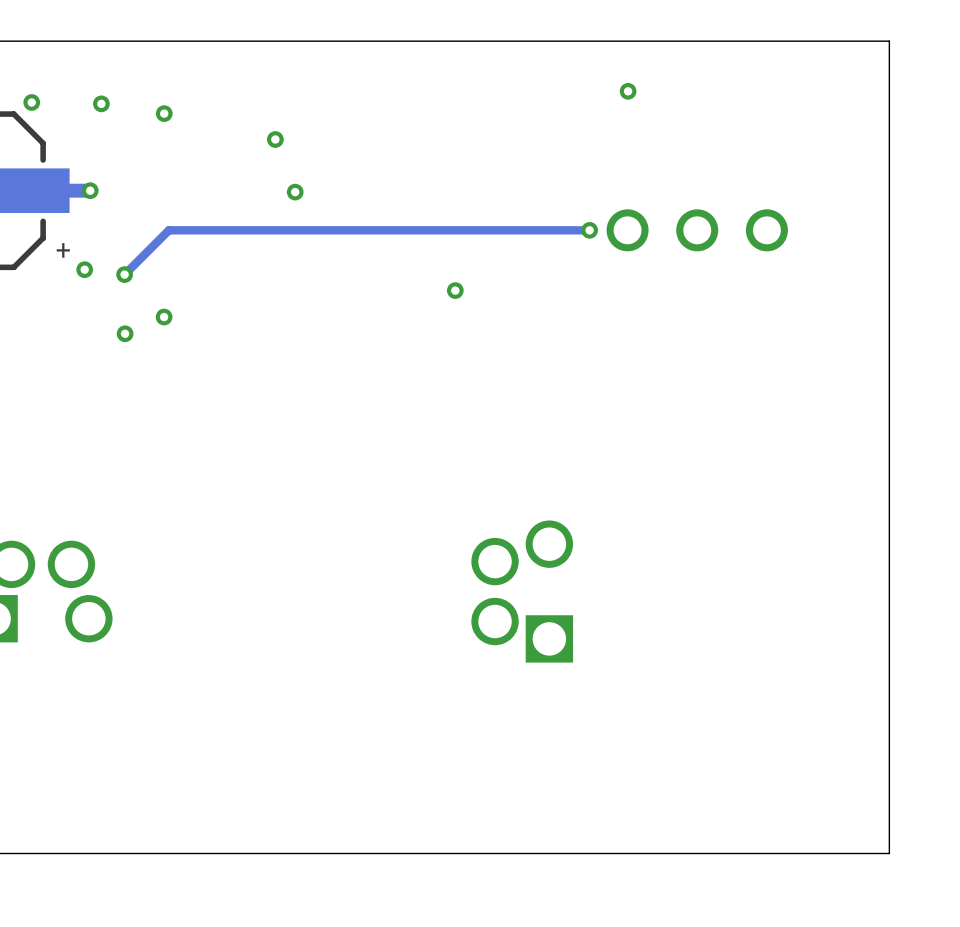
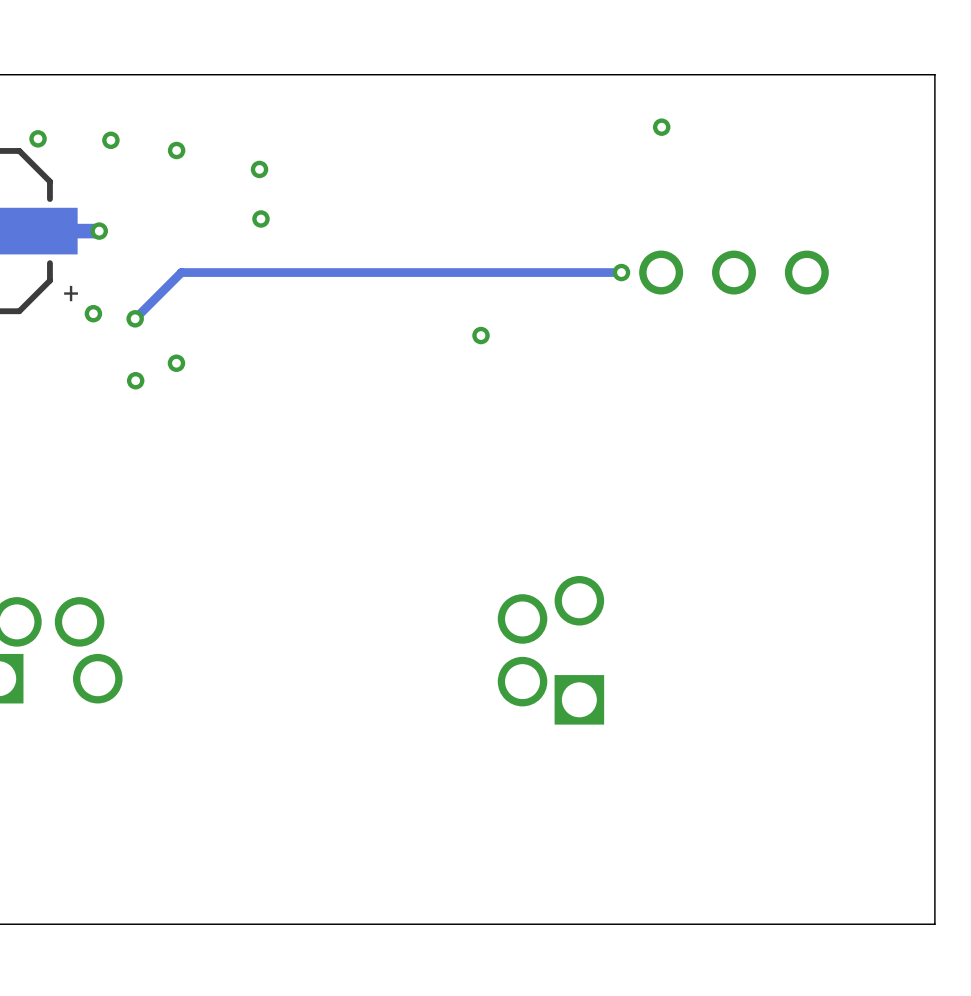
via: none -> (259, 169)
via: (275, 139) -> none
via: none -> (260, 218)
via: (295, 192) -> none

